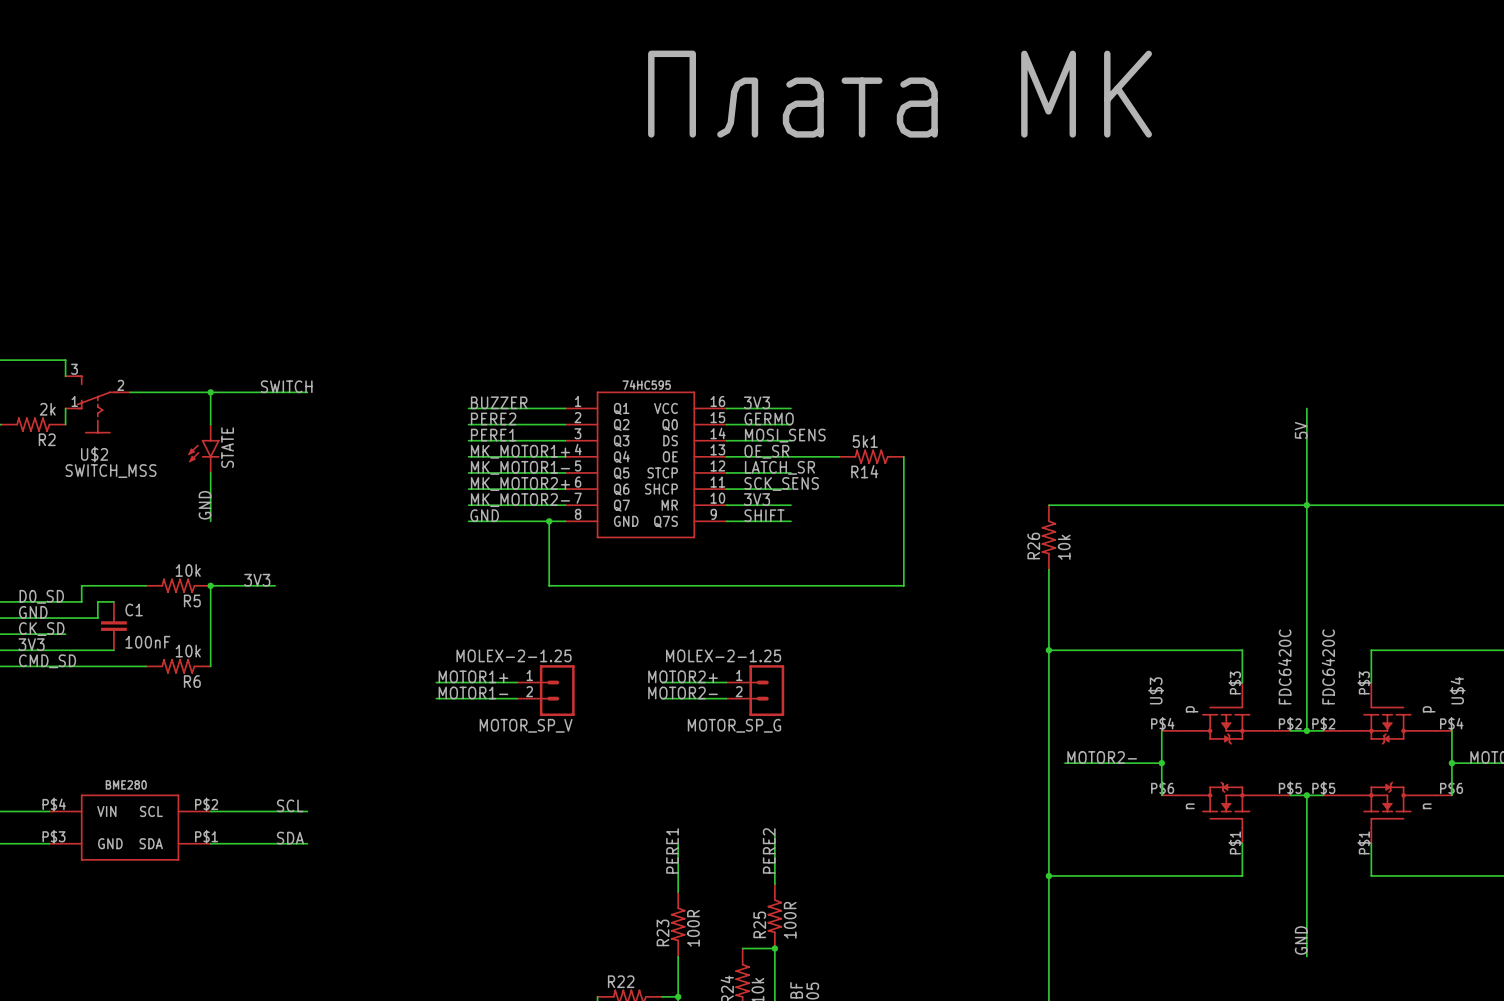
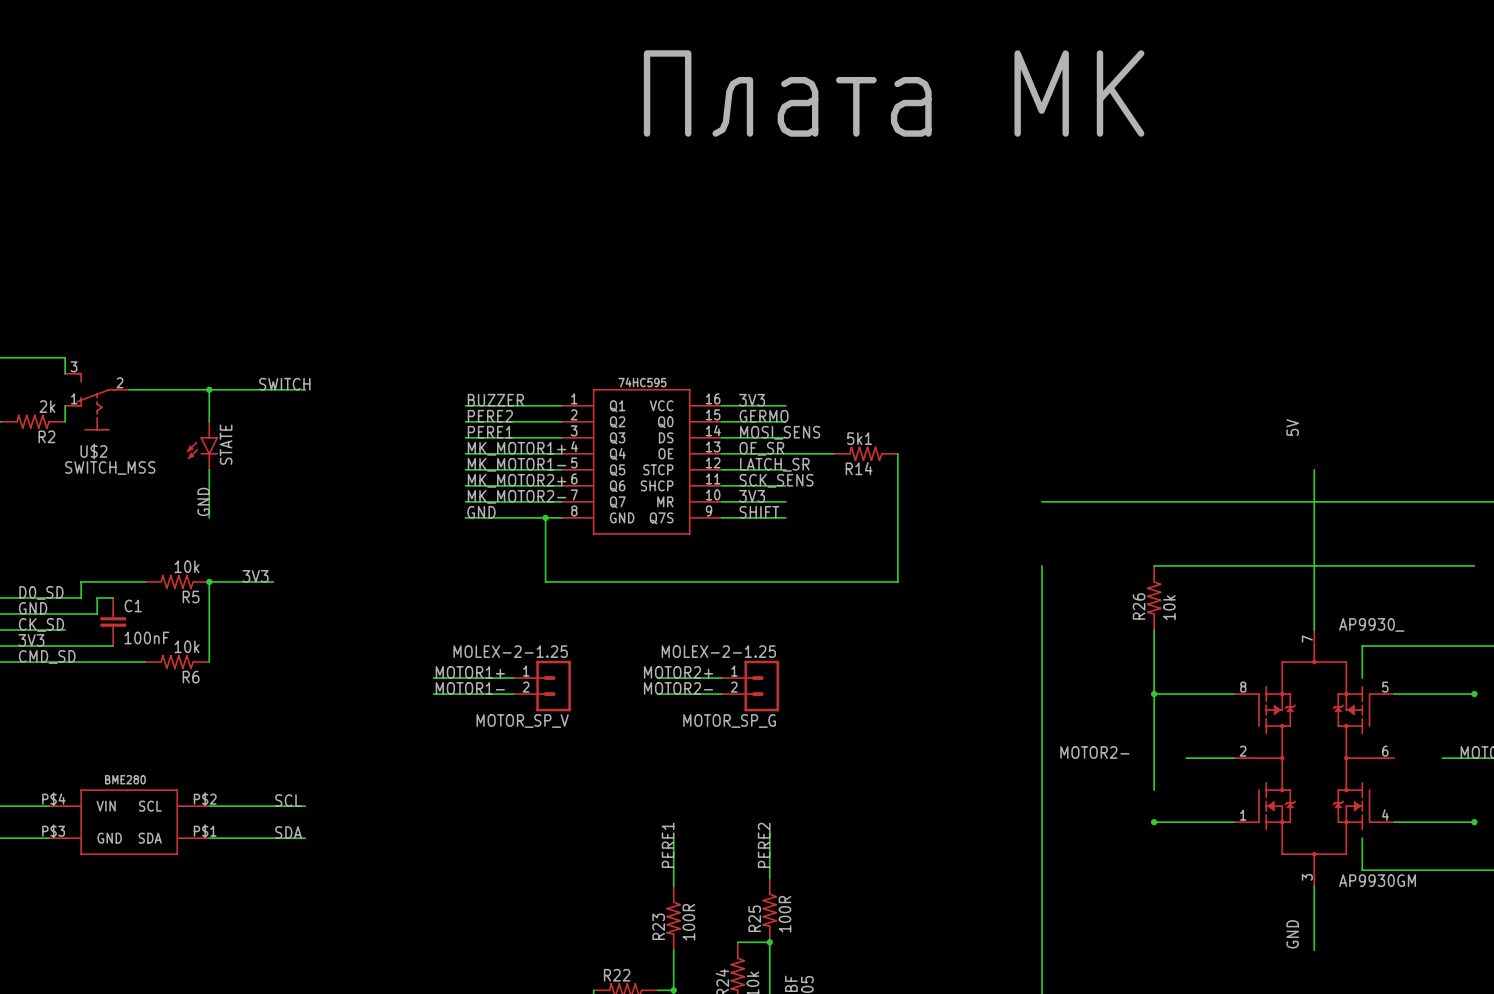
wire: (1306, 408) (1306, 730) -> none
wire: none -> (1314, 469) (1314, 629)
junction: (1306, 505) -> none
R26 position: (1048, 537) -> (1154, 597)
wire: none -> (1154, 565) (1474, 565)
wire: none -> (1154, 629) (1154, 726)
wire: (1048, 650) (1242, 650) (1242, 682) -> none
junction: (1048, 650) -> none
wire: none -> (1154, 694) (1234, 694)
junction: none -> (1154, 694)
wire: none -> (1394, 694) (1474, 694)
junction: none -> (1474, 694)
wire: (1290, 730) (1322, 730) -> none
junction: (1306, 730) -> none
wire: (1451, 730) (1451, 795) -> none
wire: (1065, 763) (1161, 763) -> none
junction: (1161, 763) -> none
wire: none -> (1186, 758) (1234, 758)
U$3: (1226, 763) -> none
AP9930_: none -> AP9930GM (1314, 758)
U$4: (1387, 763) -> none
junction: (1451, 763) -> none
wire: (1290, 795) (1322, 795) -> none
wire: (1306, 795) (1306, 956) -> none
junction: (1306, 795) -> none
wire: none -> (1154, 822) (1234, 822)
junction: none -> (1154, 822)
wire: none -> (1394, 822) (1474, 822)
junction: none -> (1474, 822)
wire: (1242, 843) (1242, 875) (1048, 875) -> none
junction: (1048, 875) -> none
wire: none -> (1314, 886) (1314, 950)

